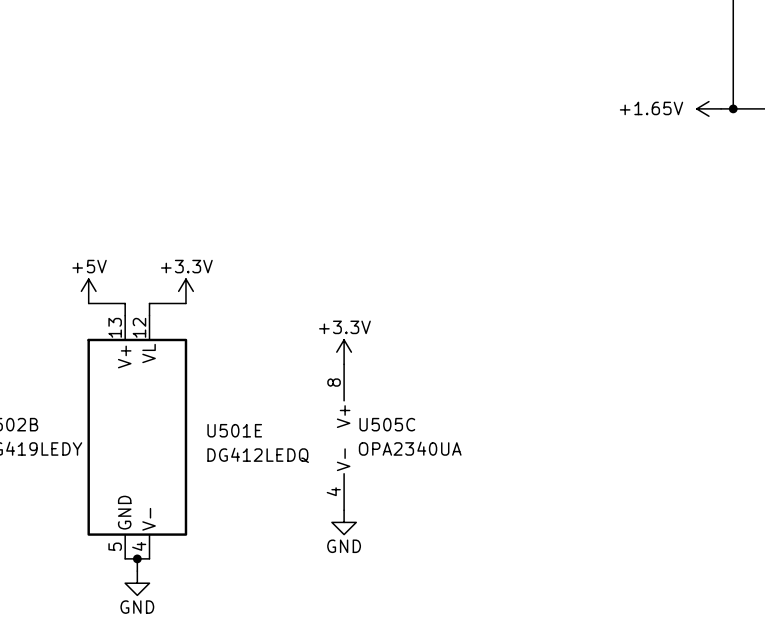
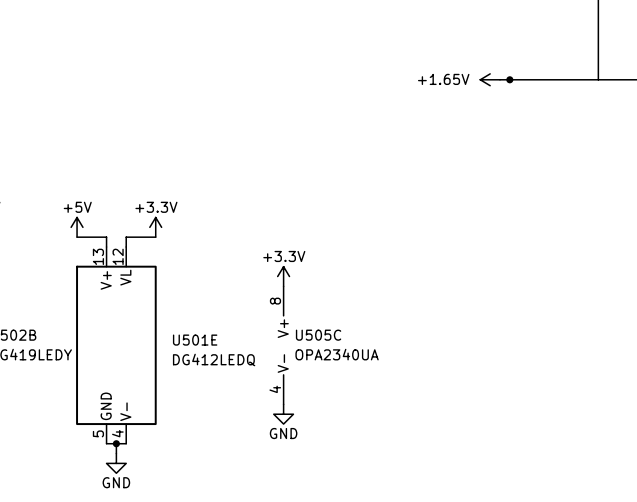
wire: none -> (499, 79) (588, 79)
junction: none -> (509, 79)
power symbol position: +1.65V (708, 108) -> +1.65V (490, 79)
junction: (733, 108) -> none

